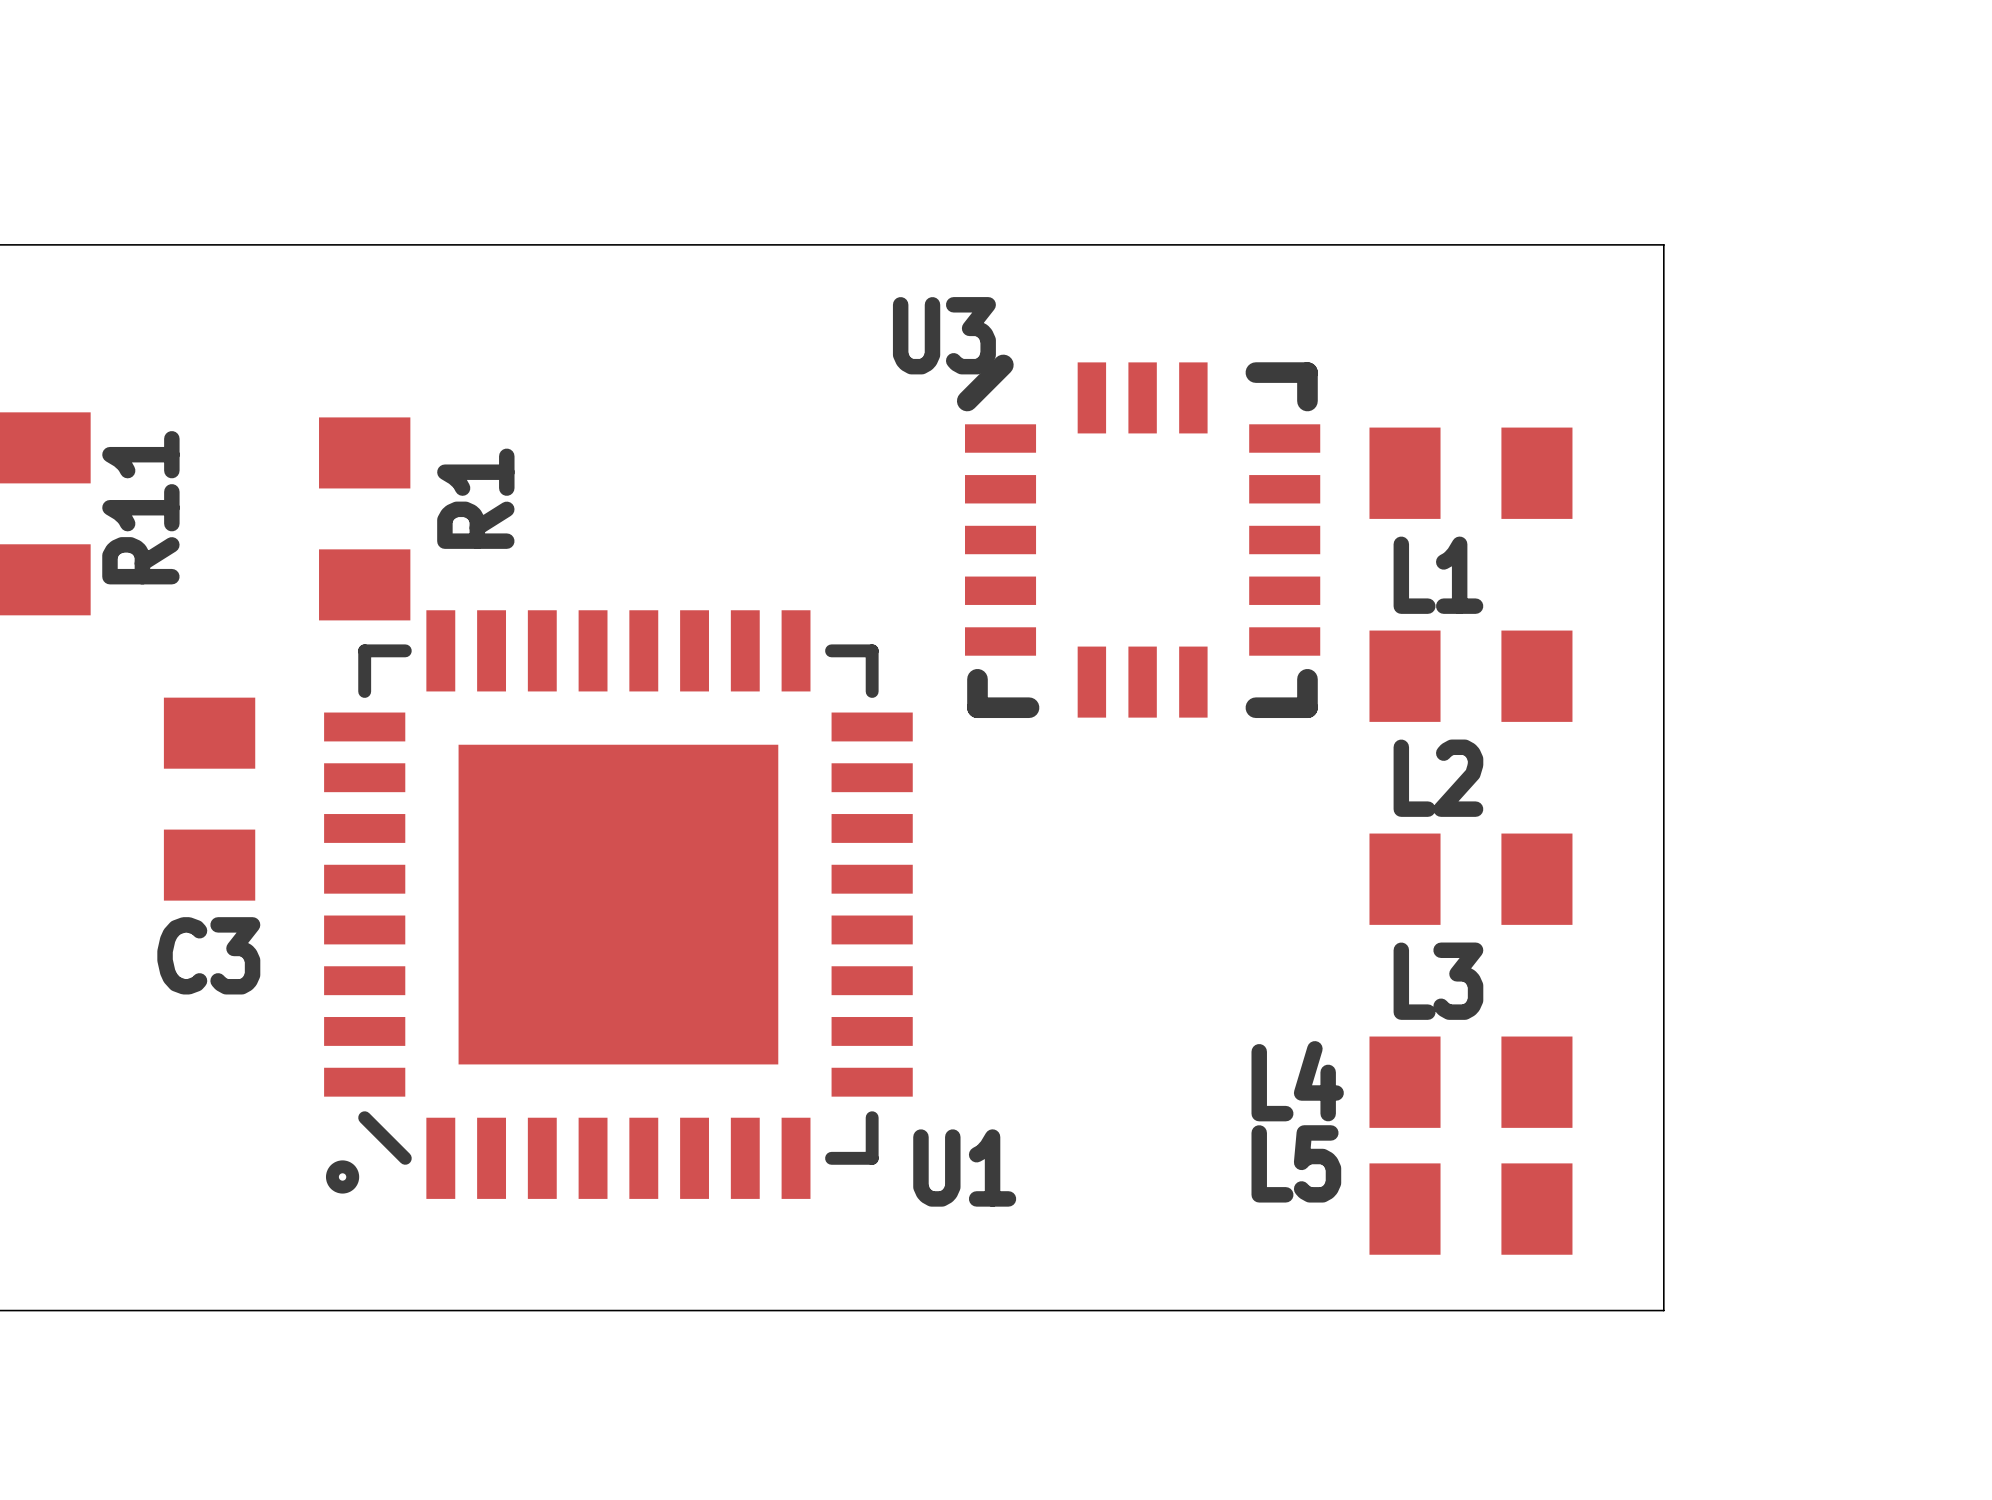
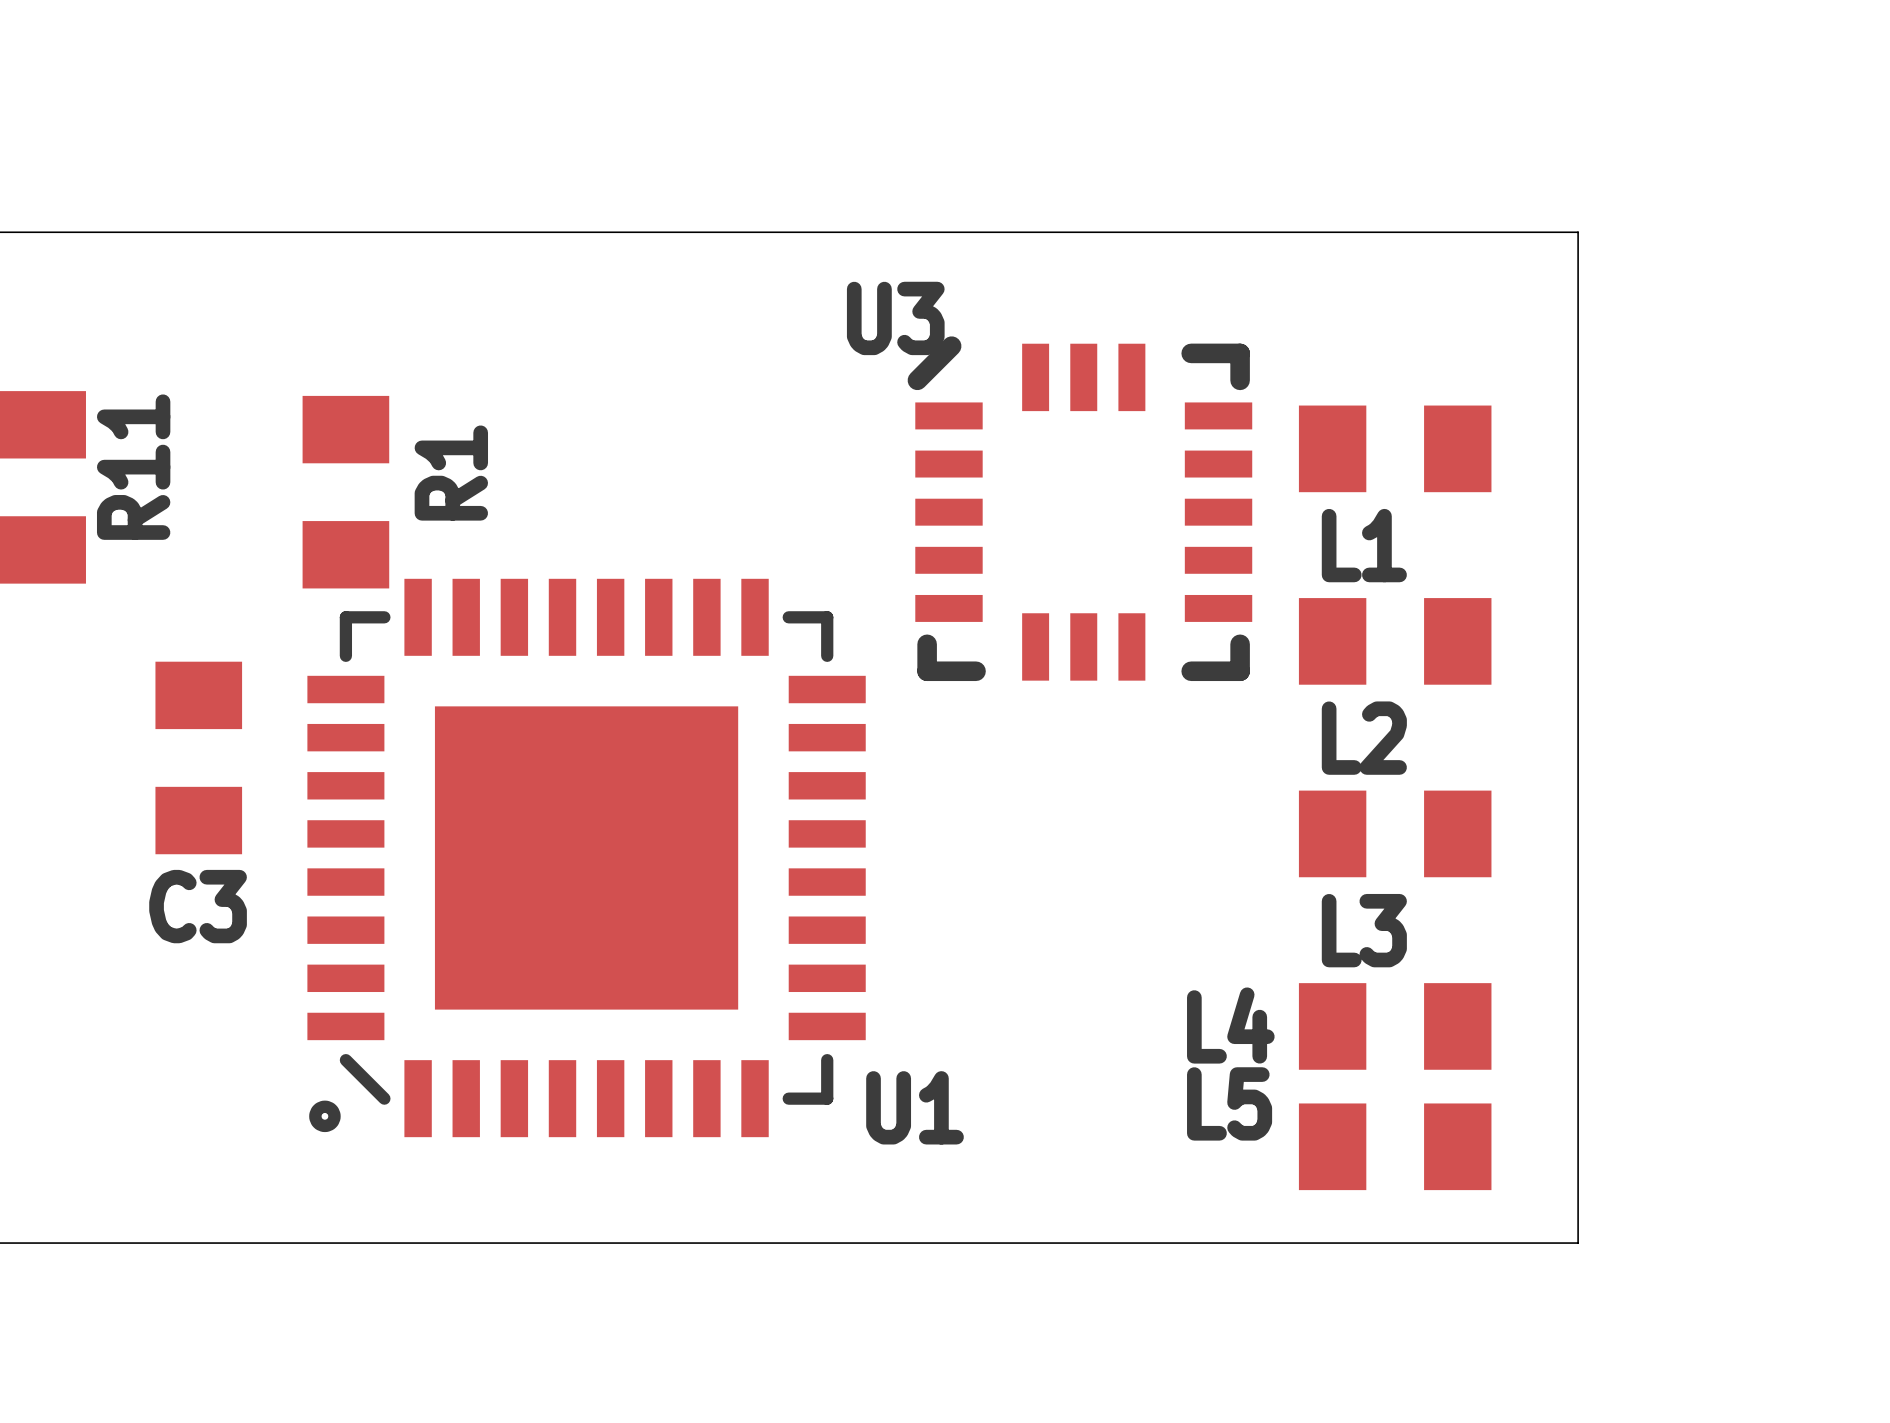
text position: R11 (140, 507) -> R11 (133, 467)

